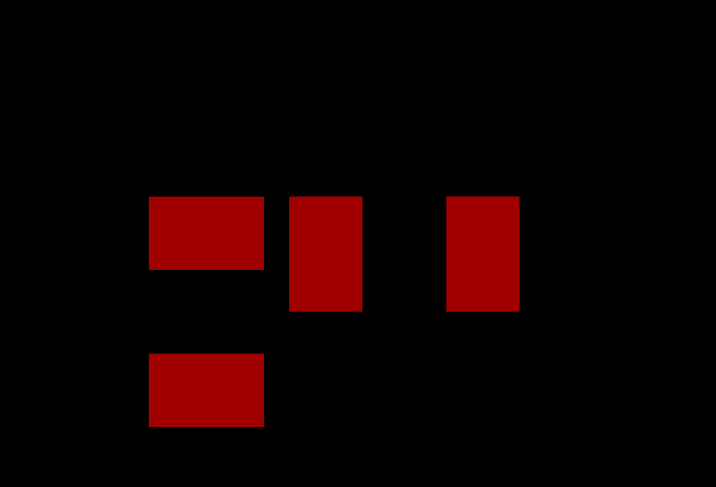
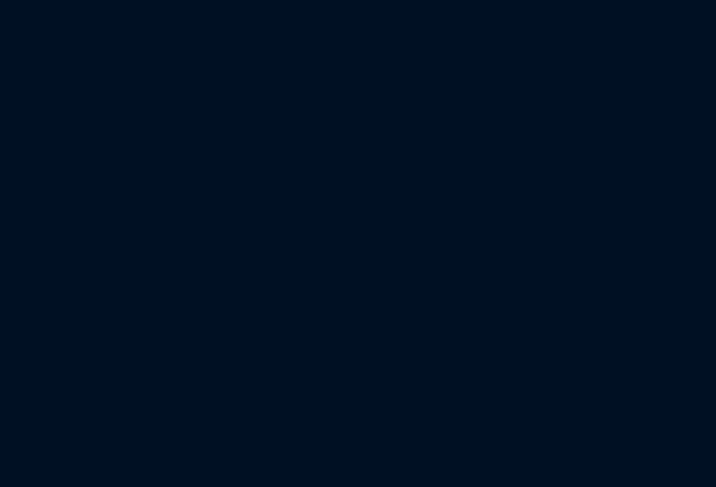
part: (404, 254) -> none
part: (206, 311) -> none

